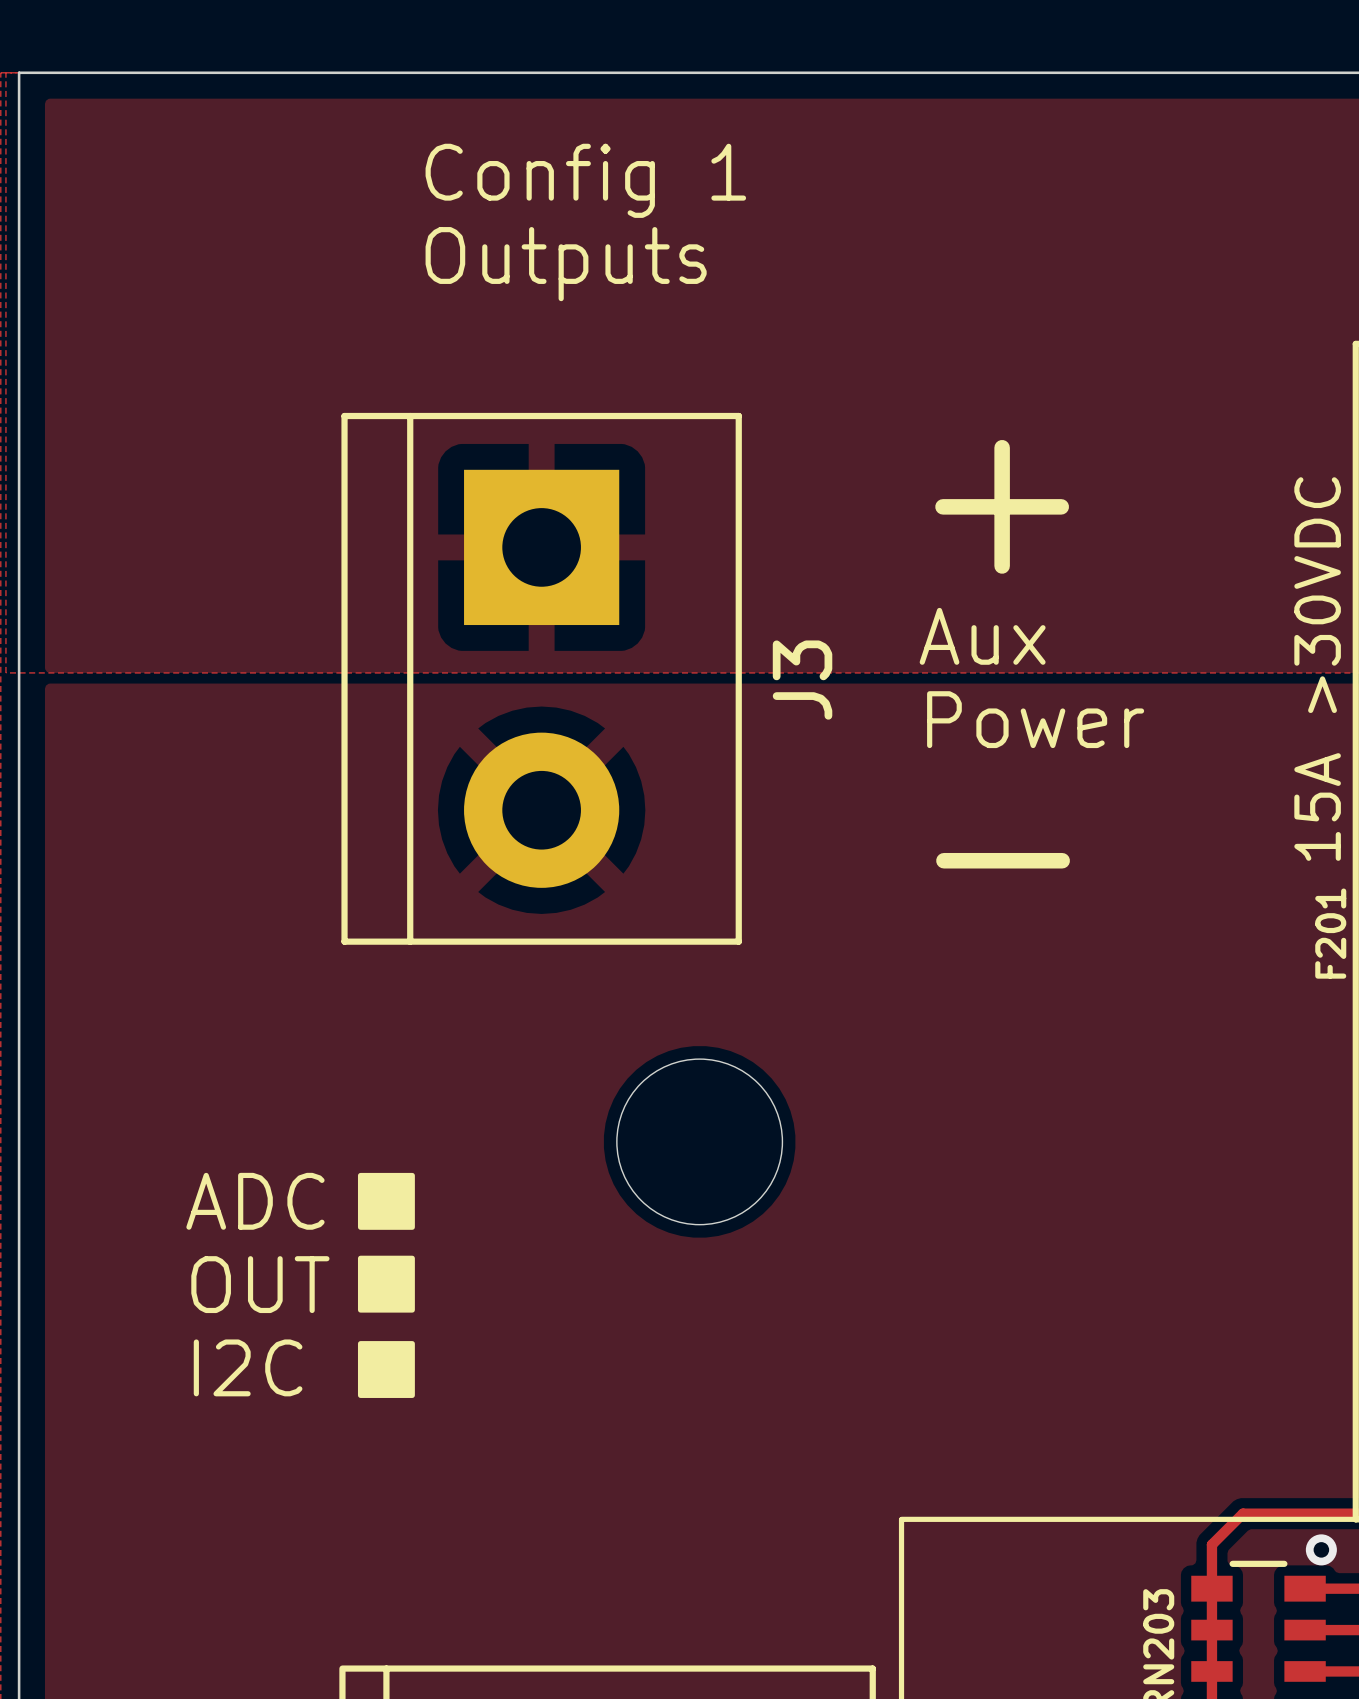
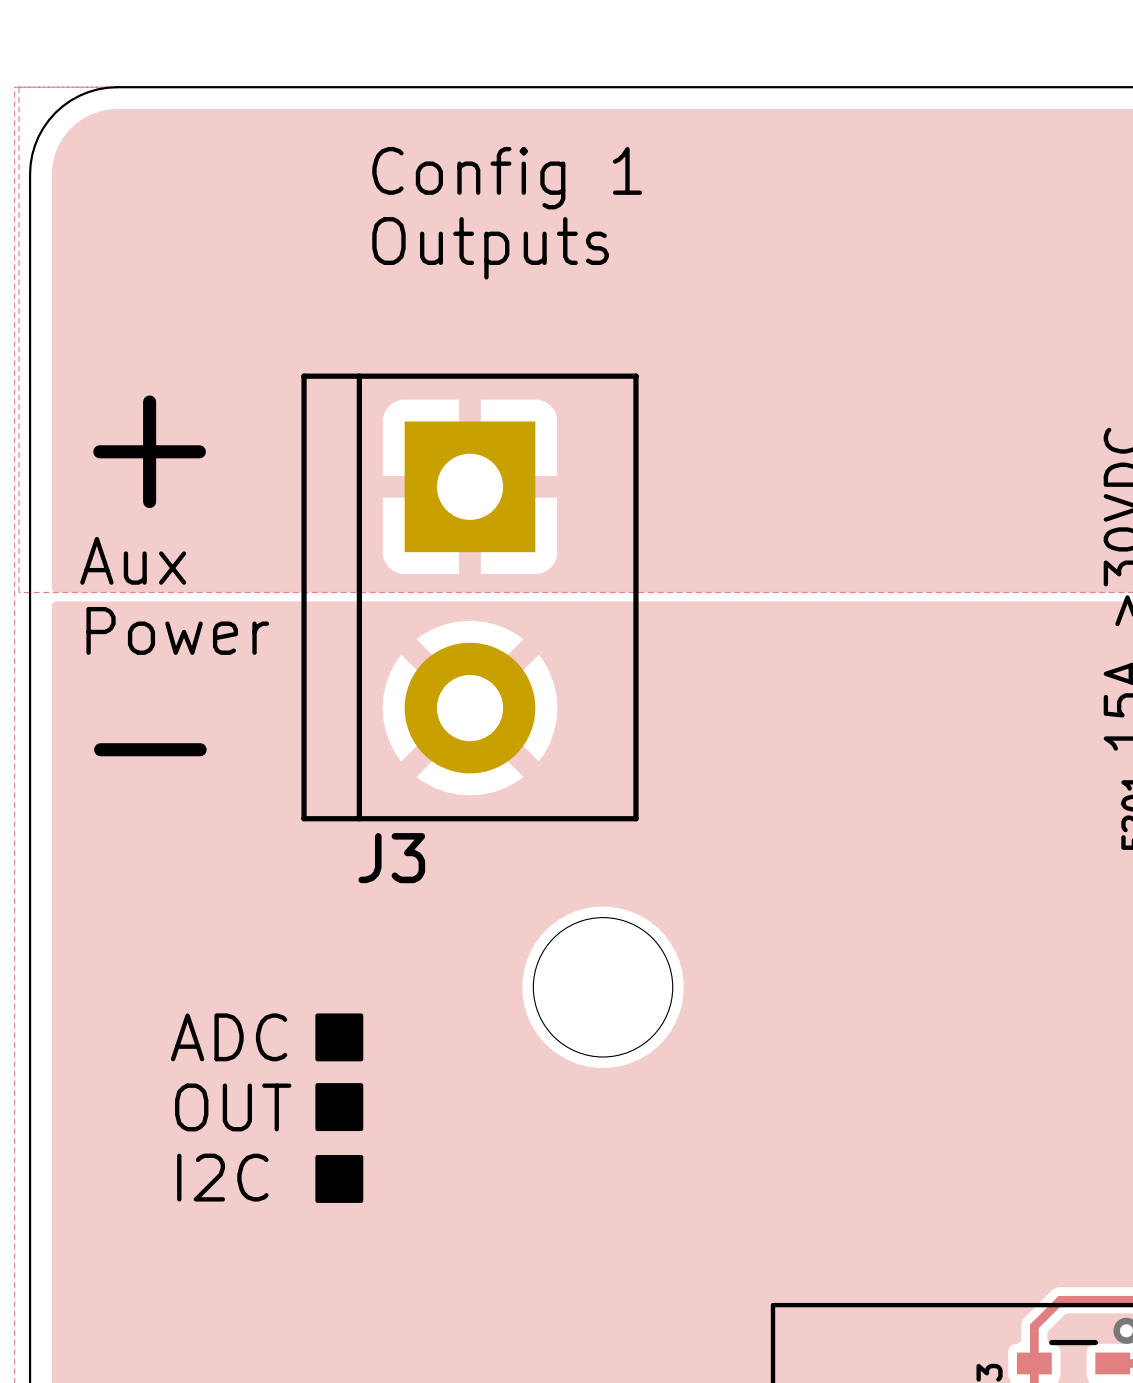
board edge: (122, 72) (19, 72) (19, 176) -> (117, 87) (88, 92) (70, 100) (55, 112) (43, 127) (34, 145) (30, 174)
text position: + (1002, 506) -> + (149, 451)
text position: Aux (982, 636) -> Aux (133, 560)
J3 name rotation: 0° (802, 680) -> 90° clockwise (391, 858)
J3 name position: J3 (802, 680) -> J3 (391, 858)
text position: Power (1035, 719) -> Power (177, 630)
text position: - (1003, 860) -> - (150, 749)

